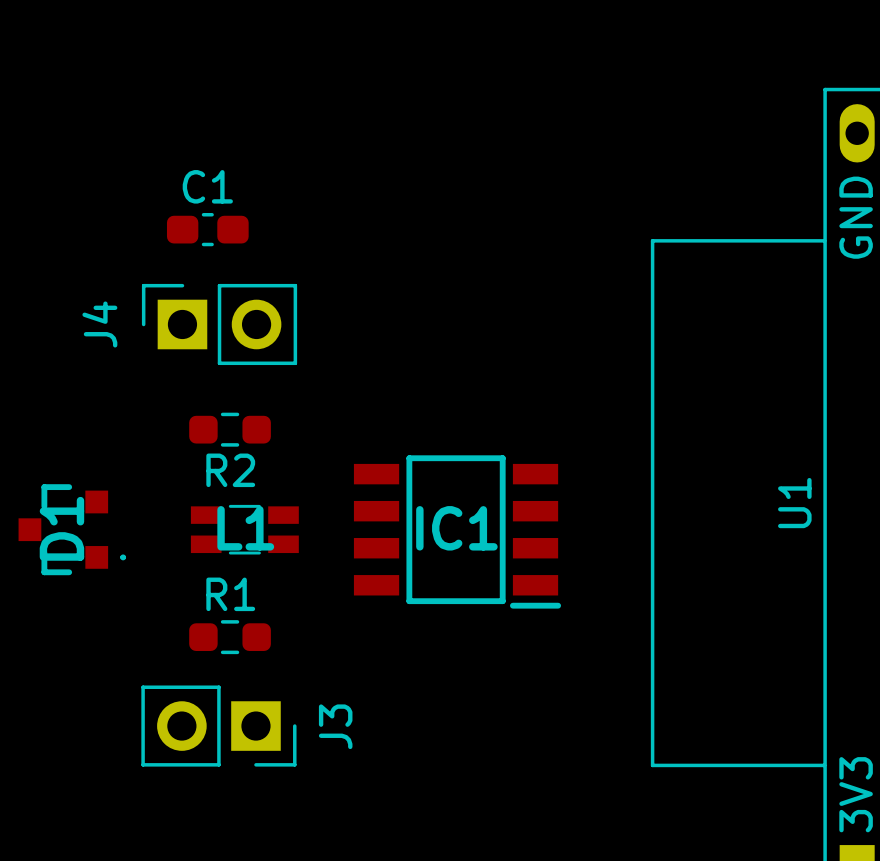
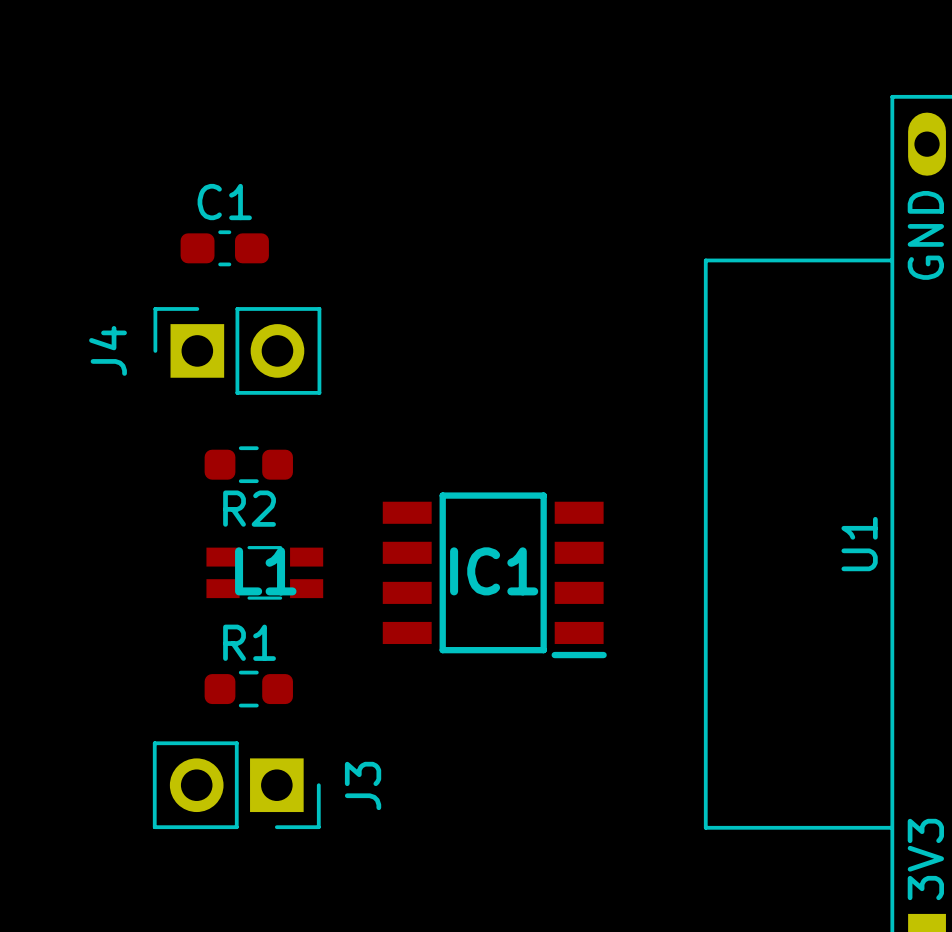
D1: (72, 529) -> none

